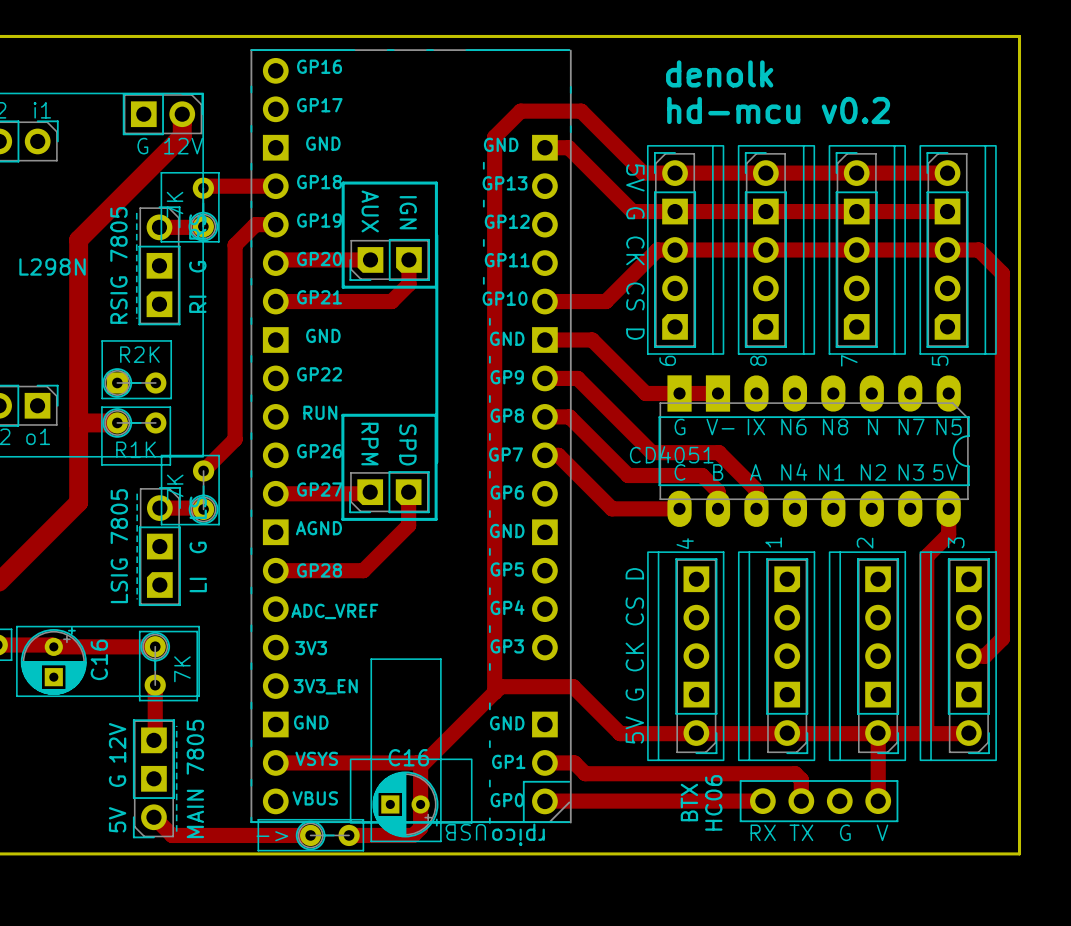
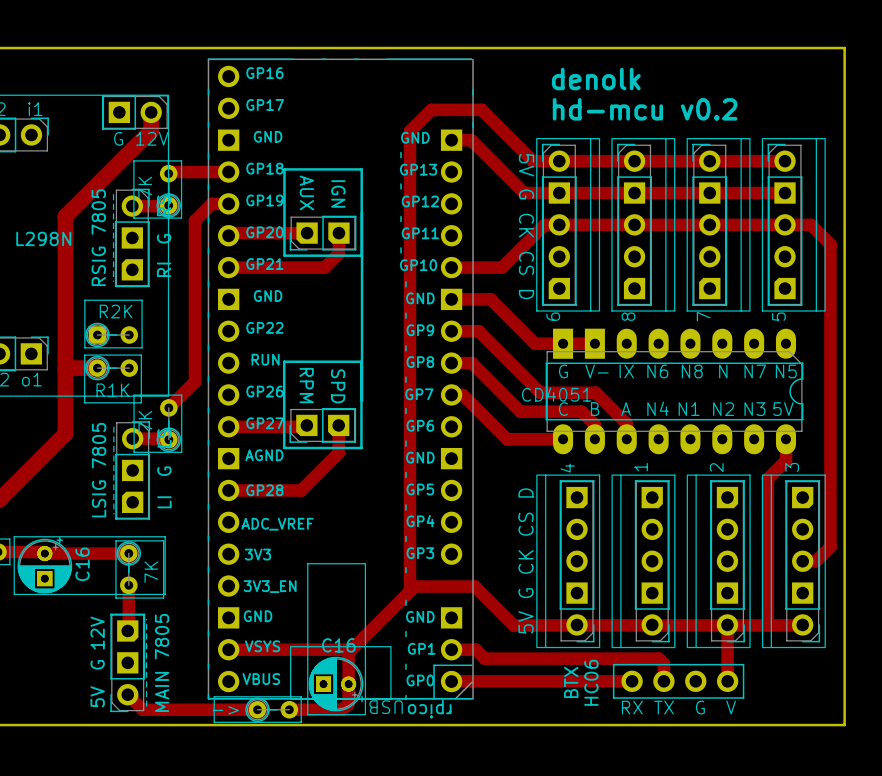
part: none -> (44, 566)
part: none -> (336, 684)

